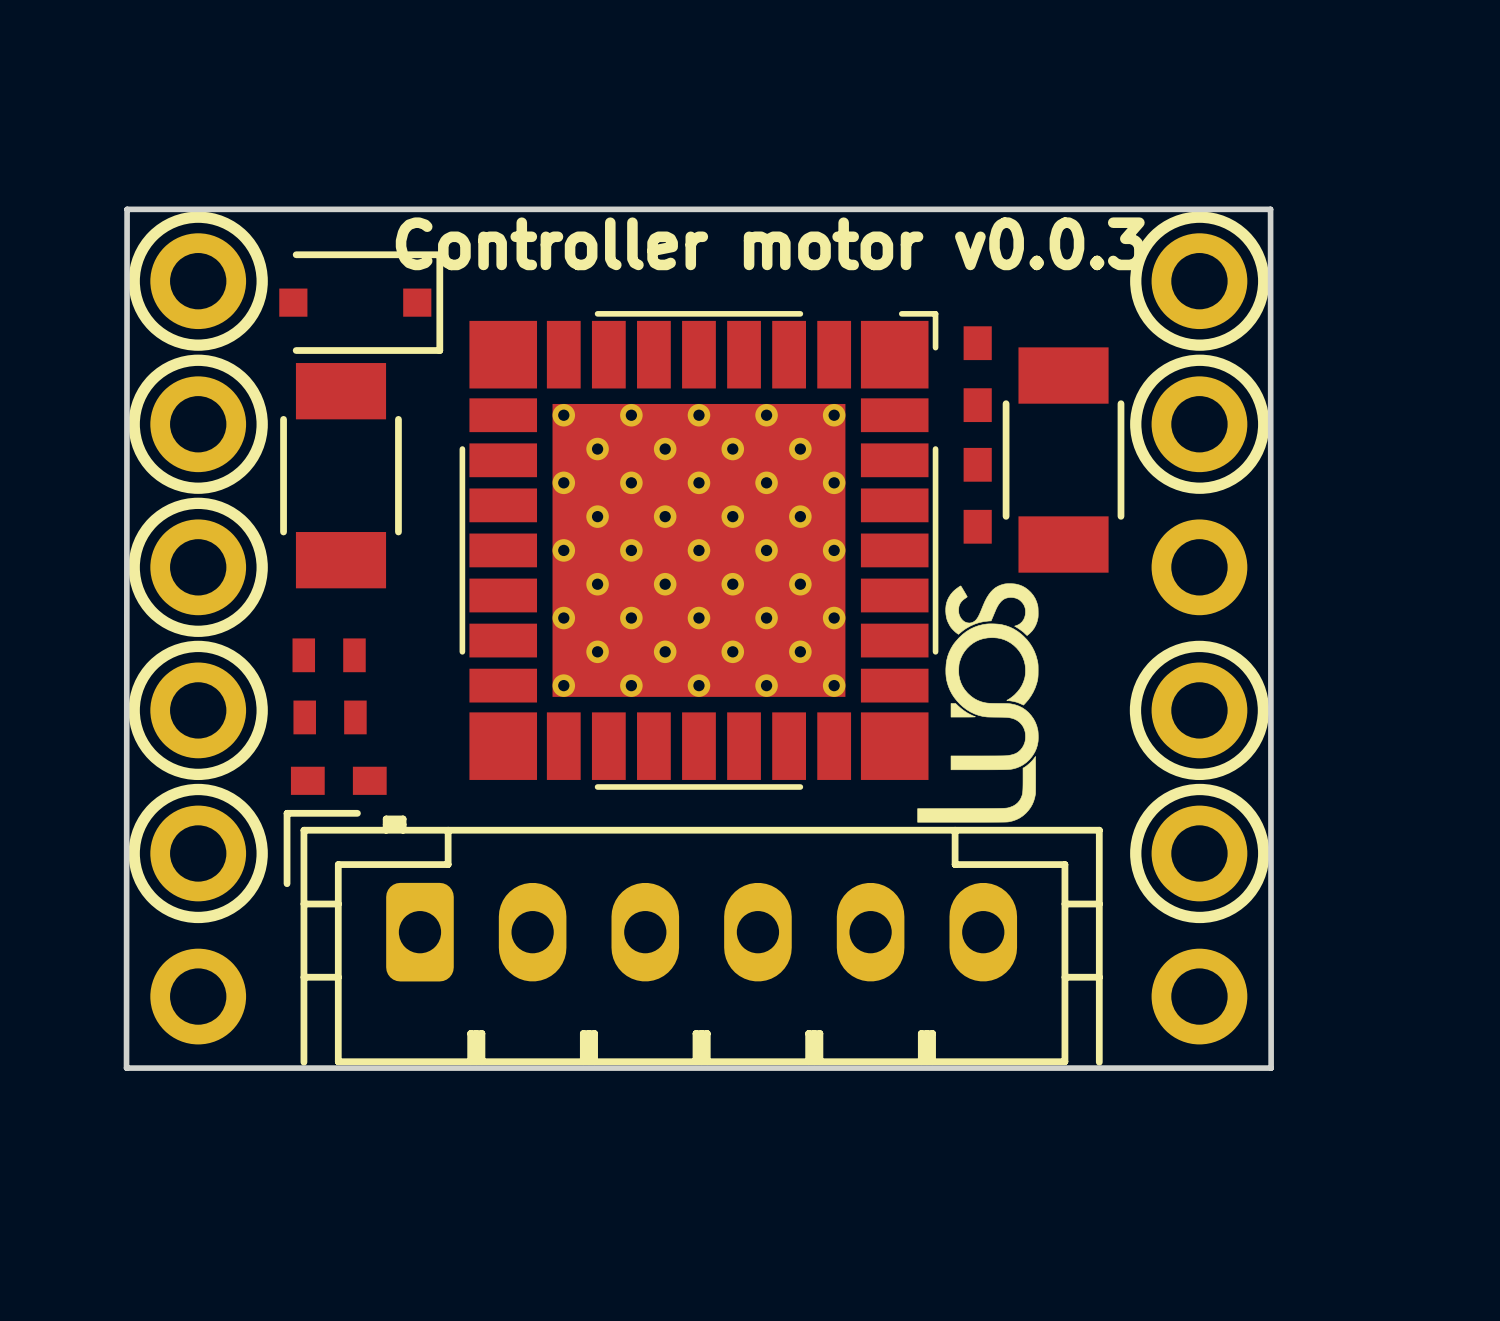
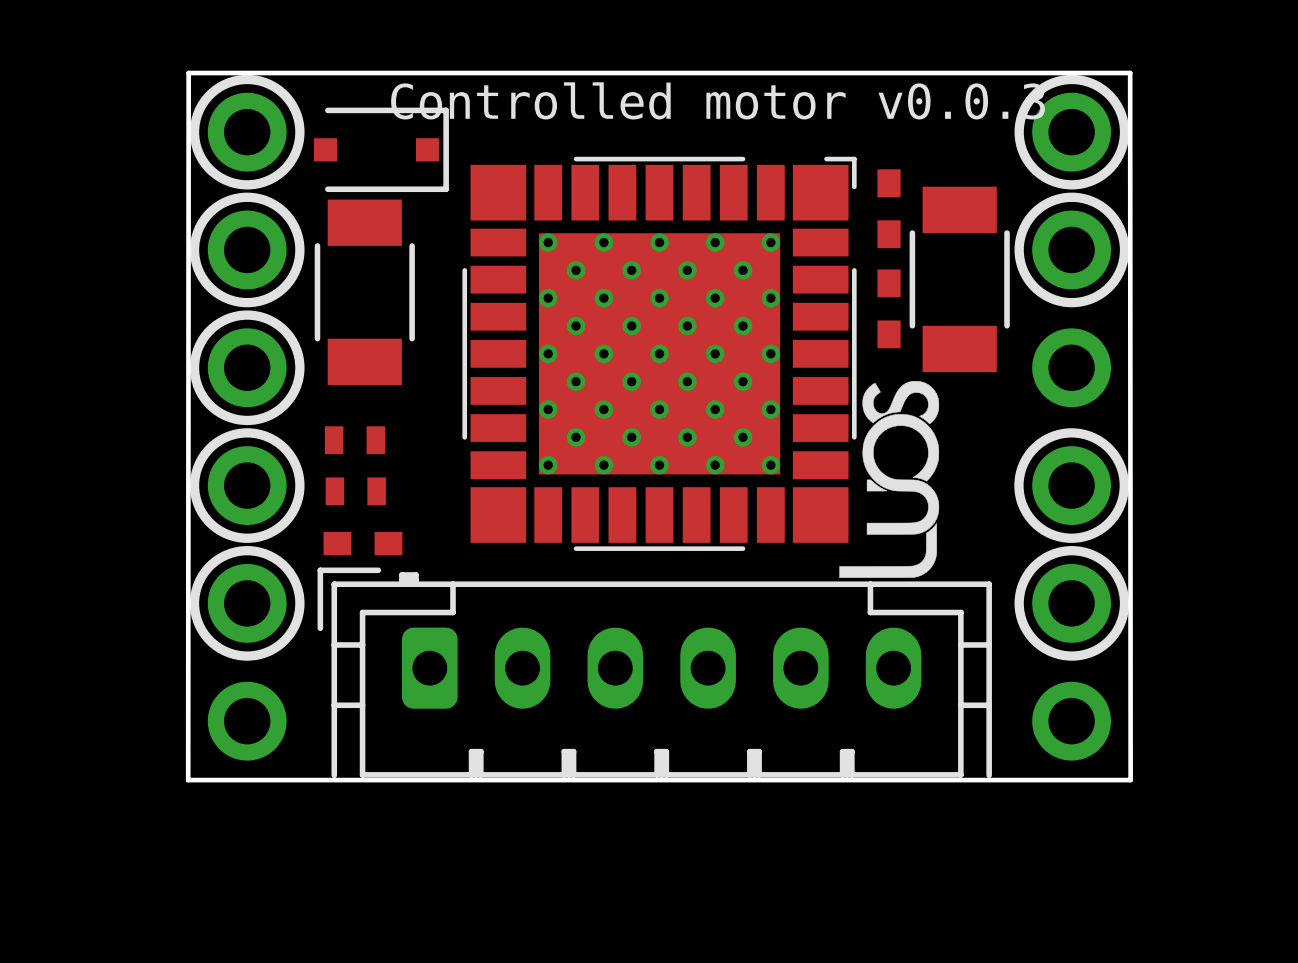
text: Controller motor v0.0.3 (770, 243) -> Controlled motor v0.0.3 (718, 100)

